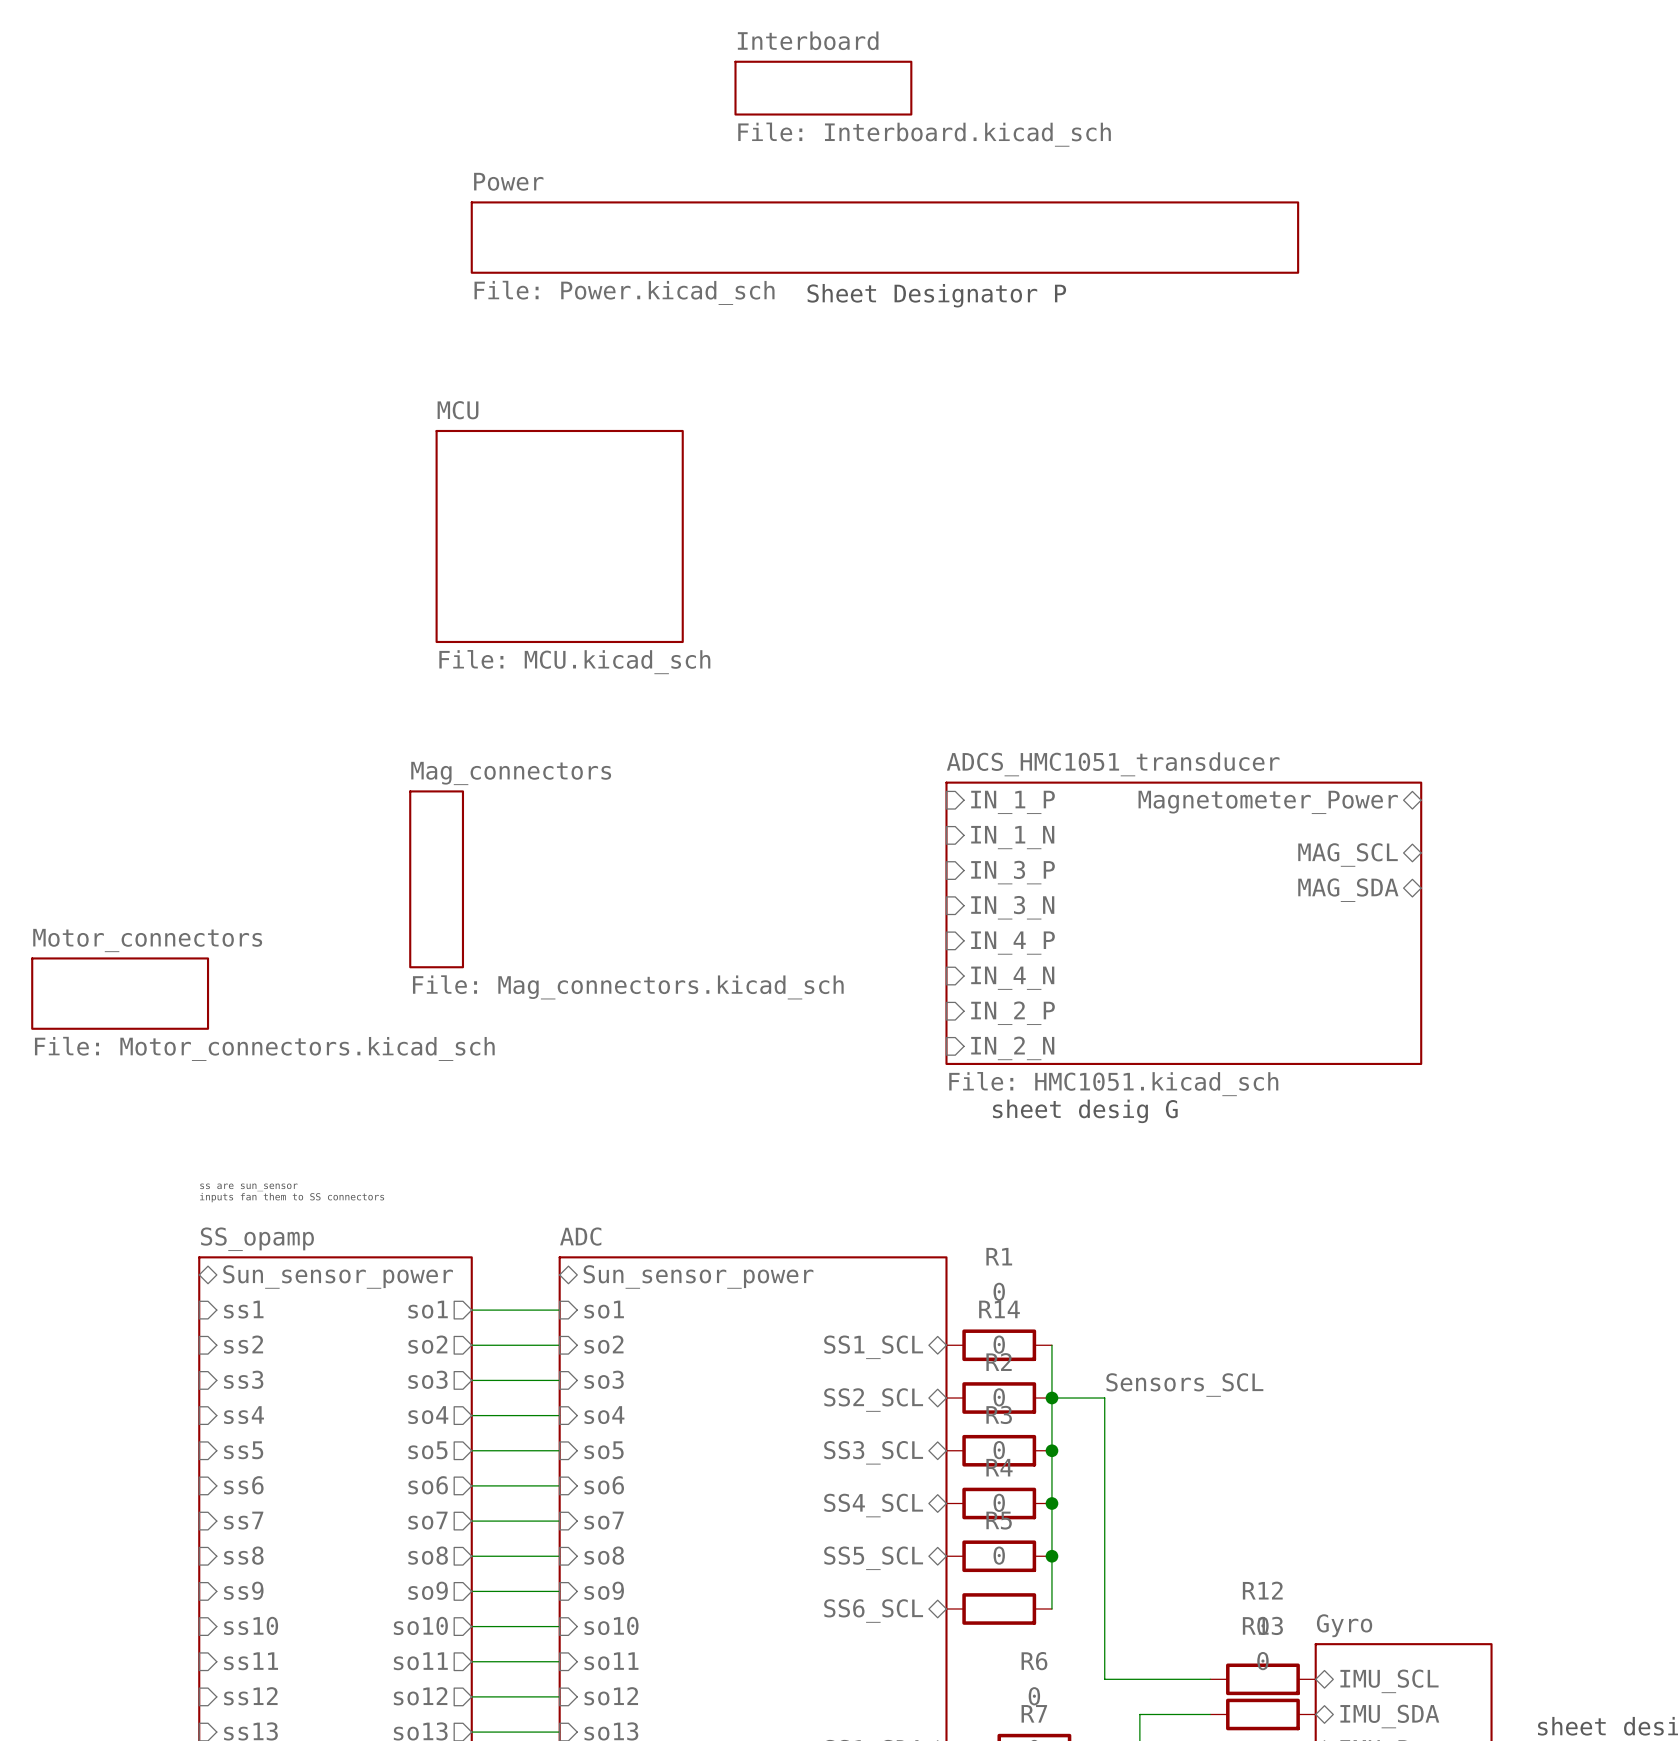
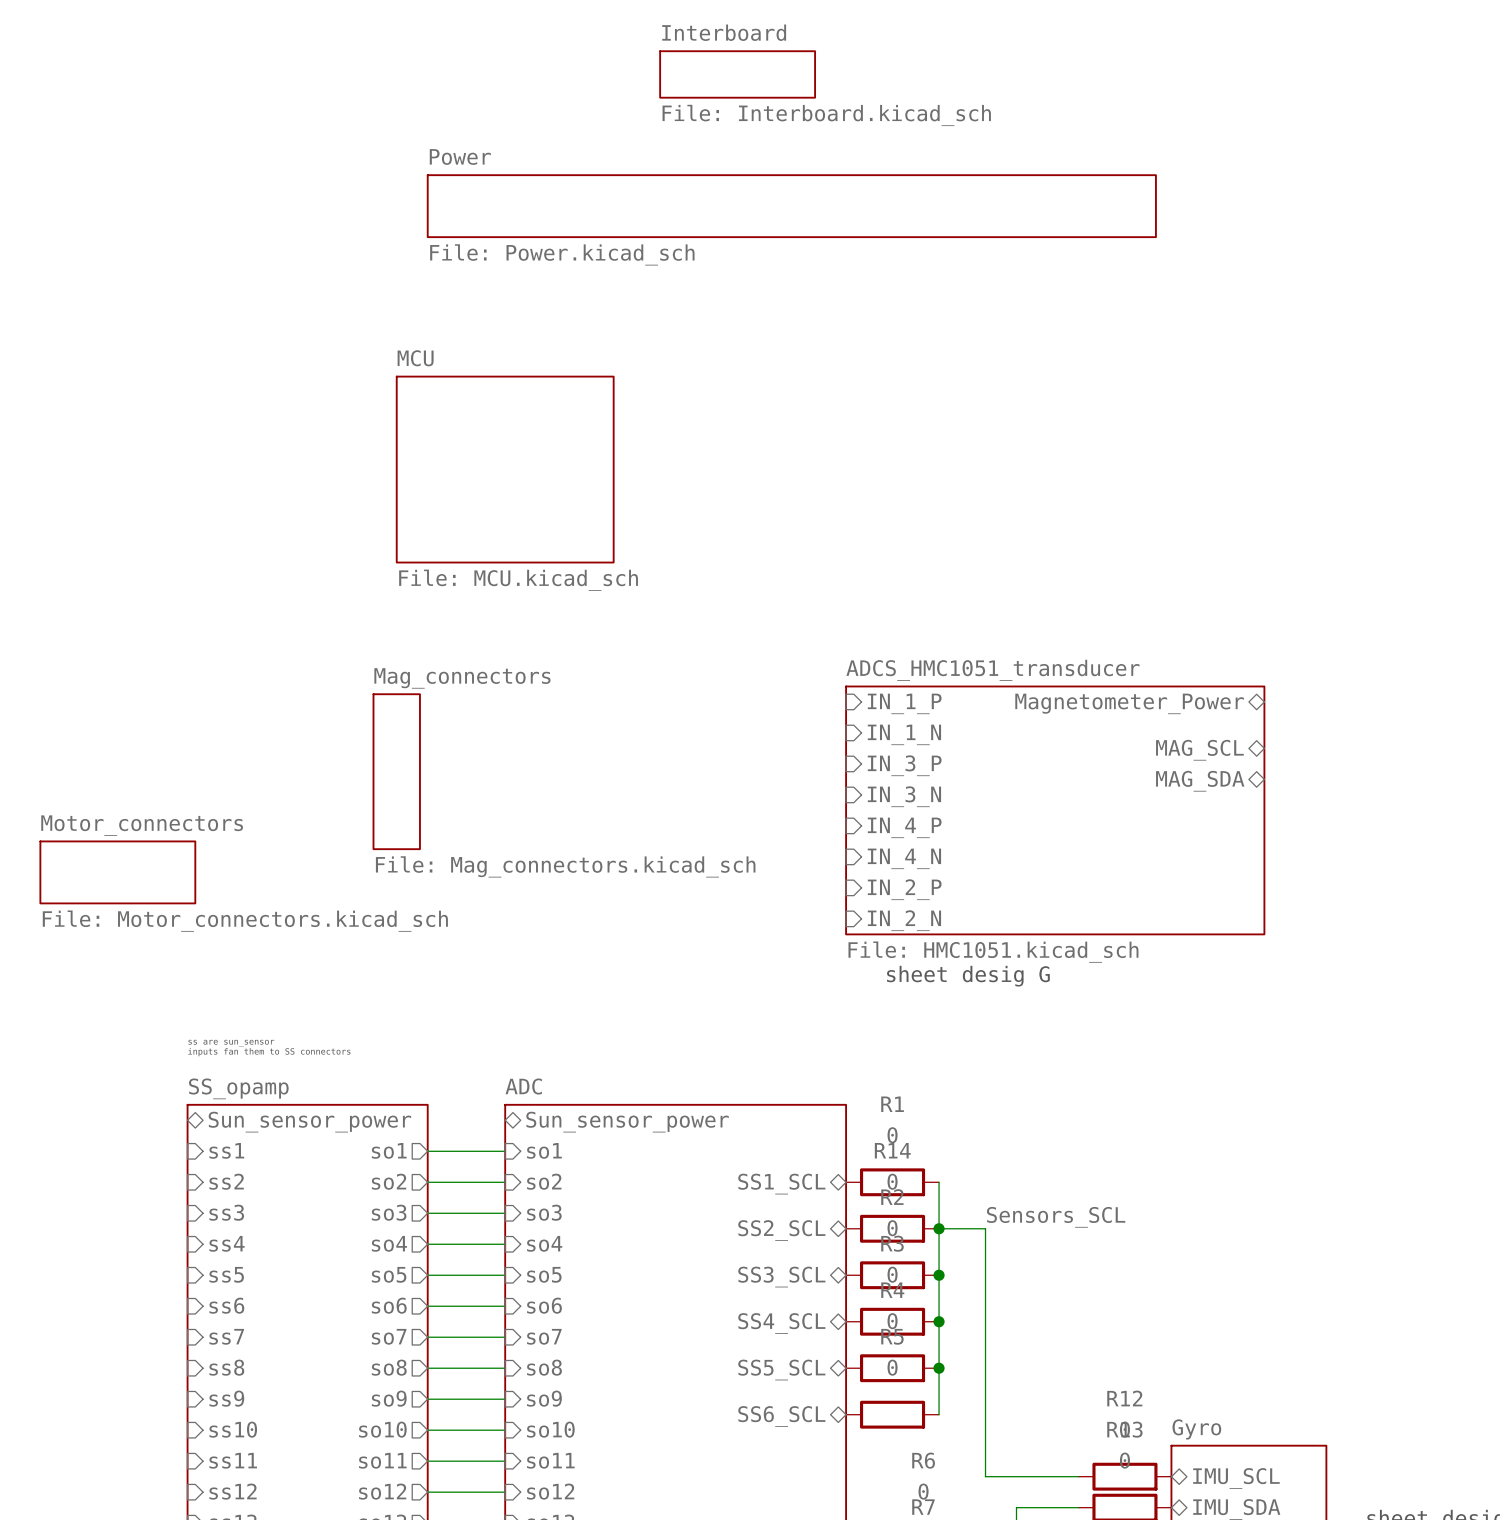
text: Sheet Designator P (936, 295) -> none

